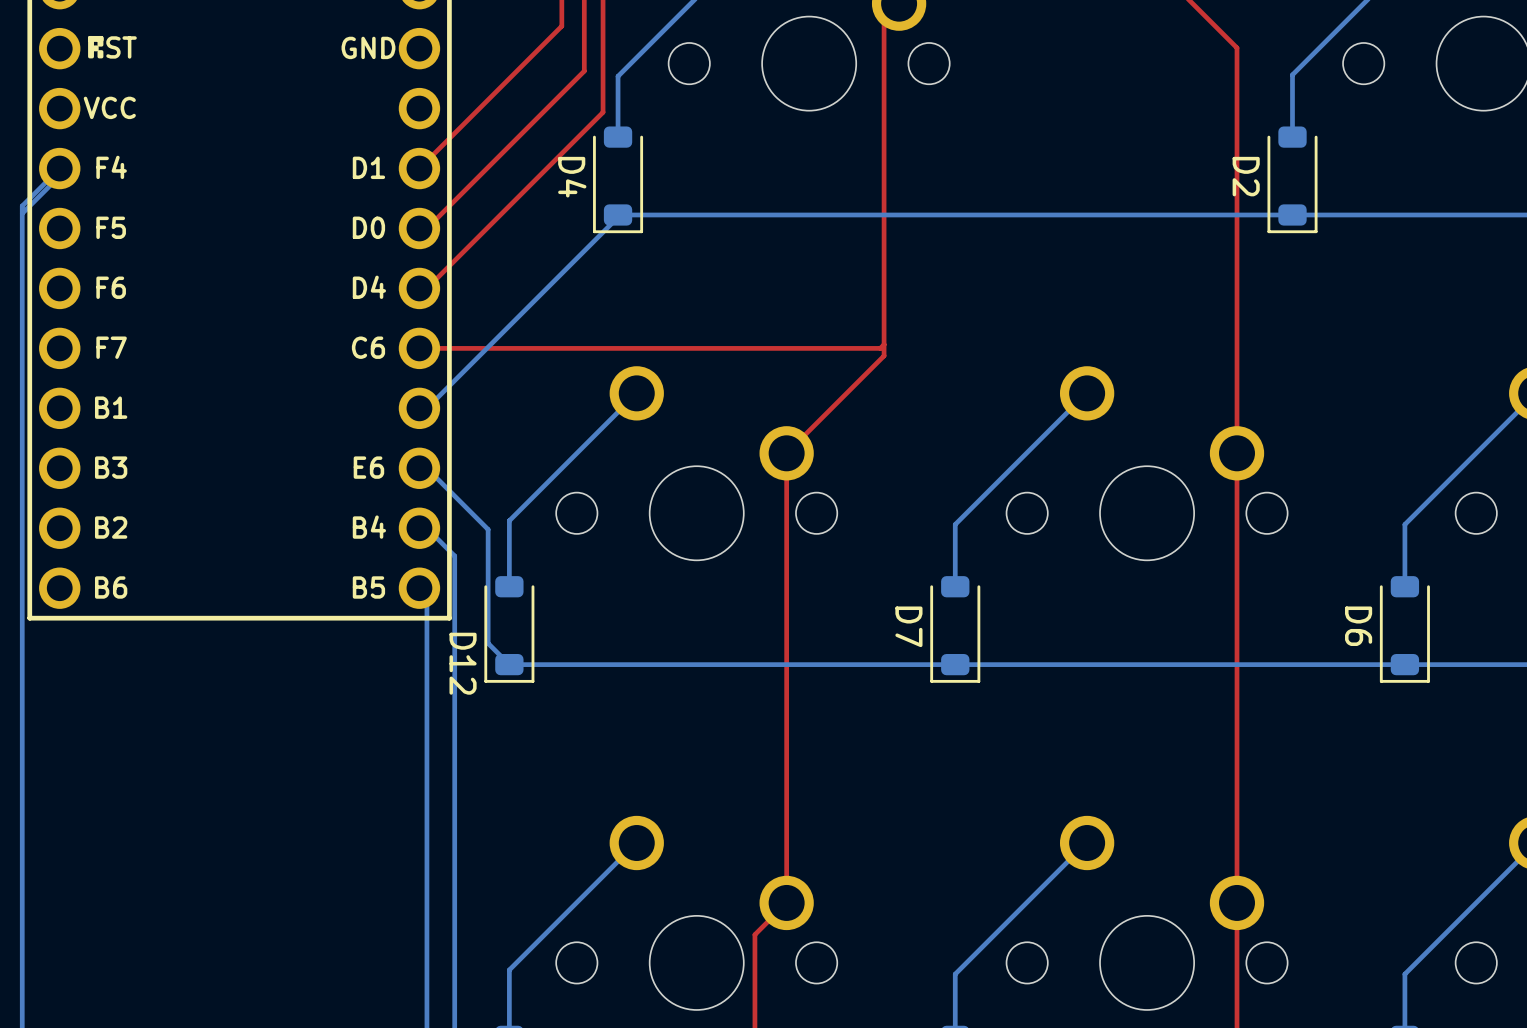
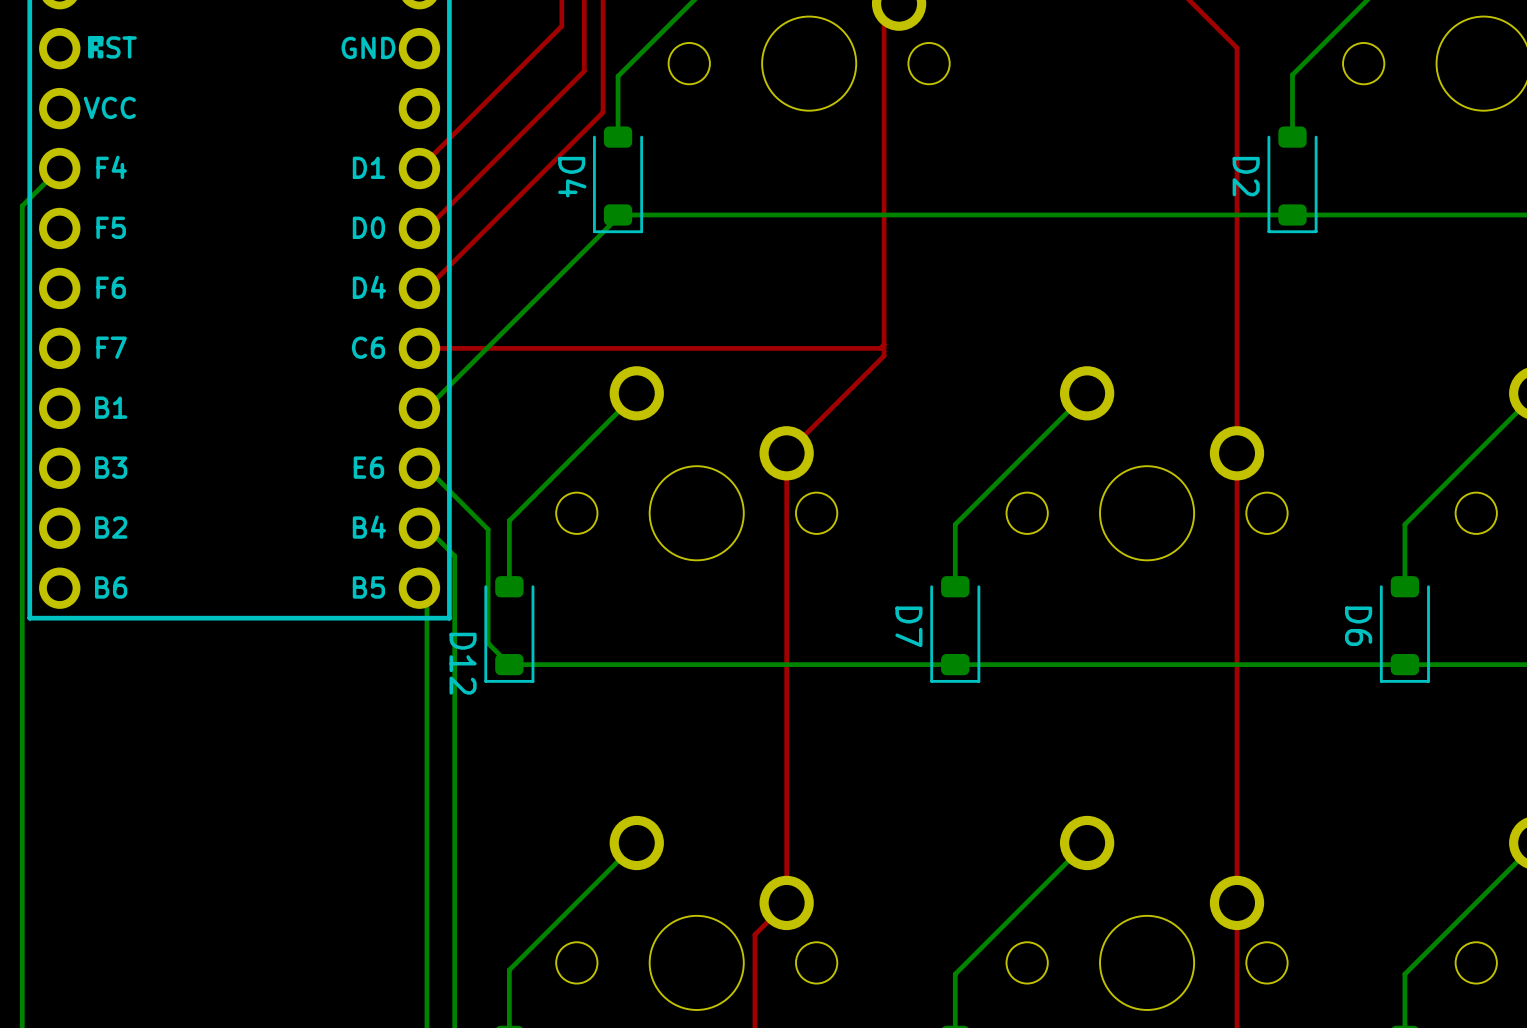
bottom track: (67, 168) (22, 213) -> none

